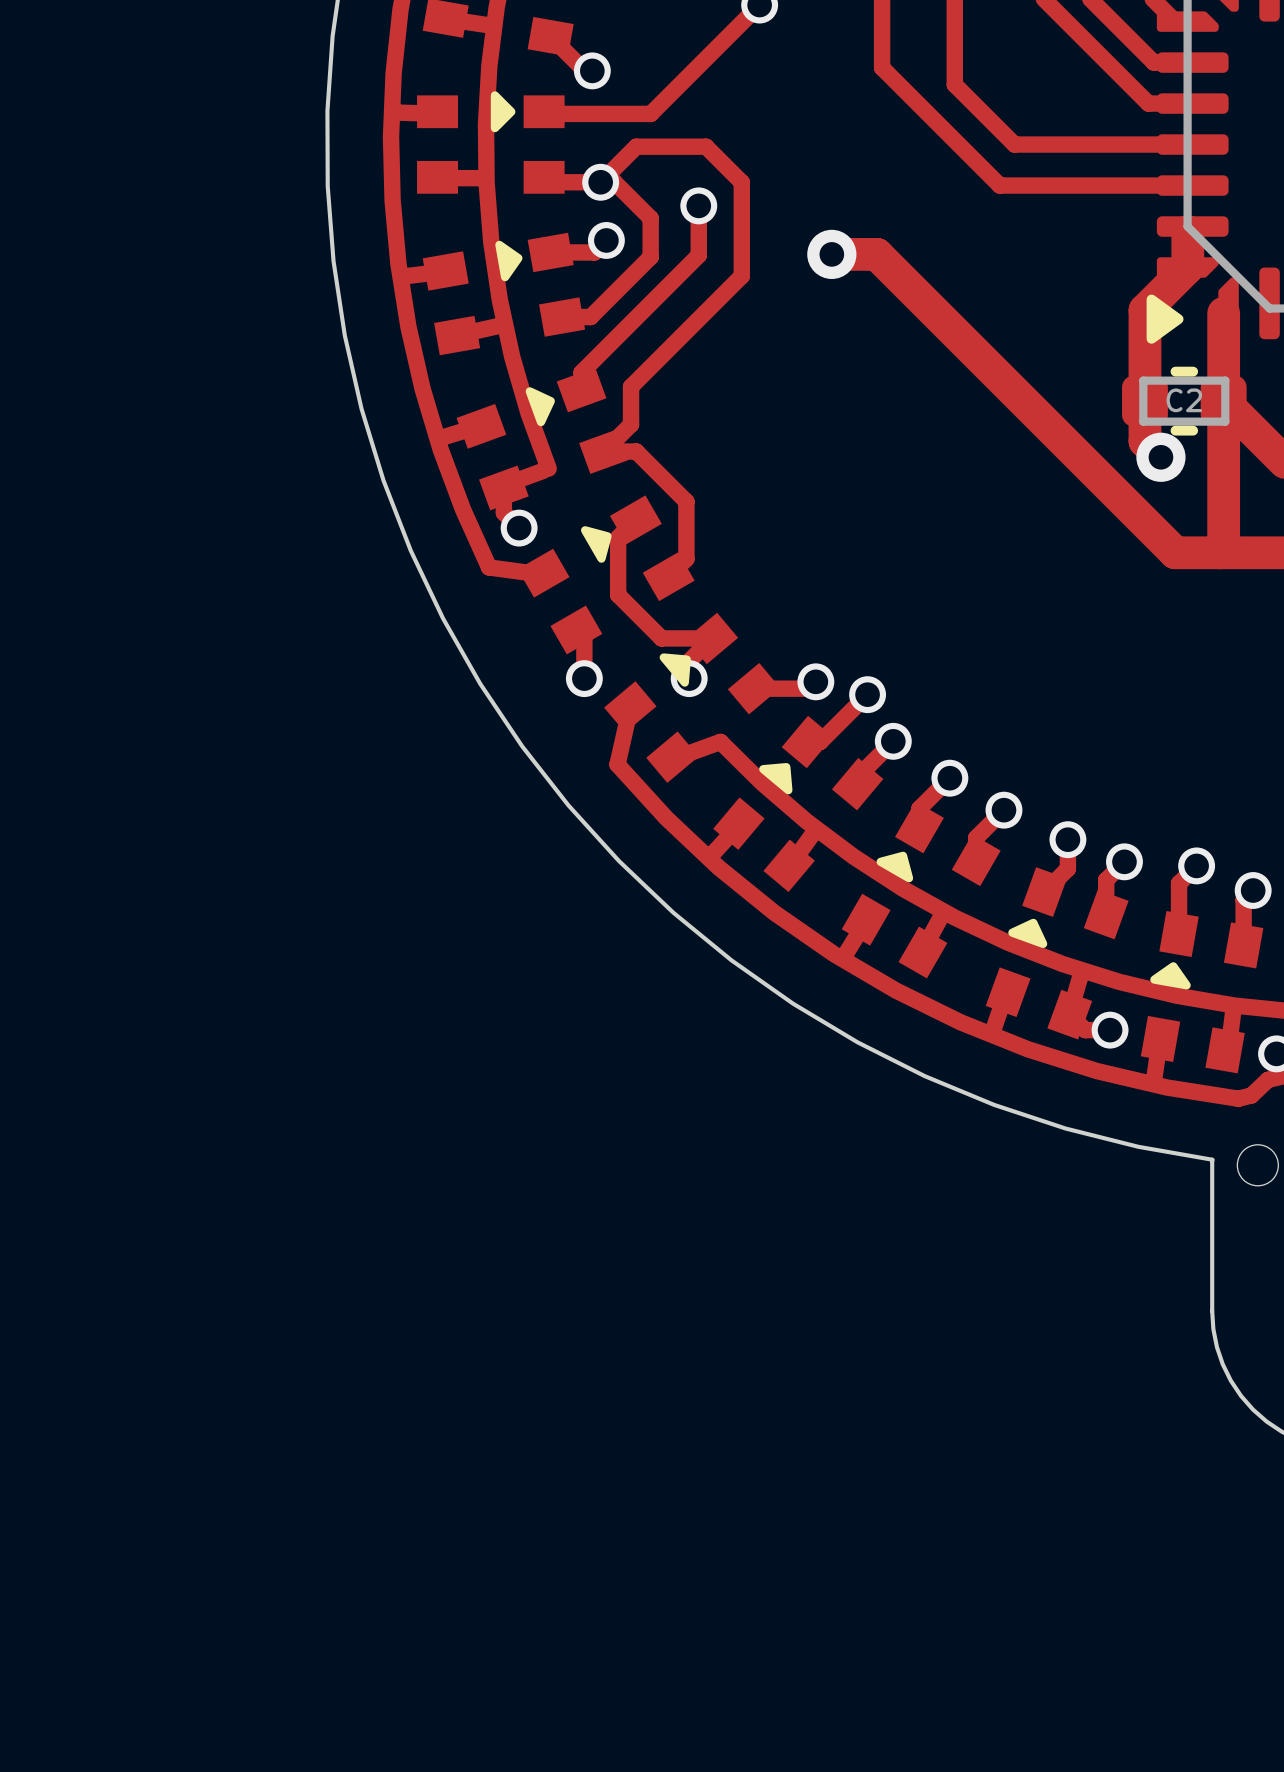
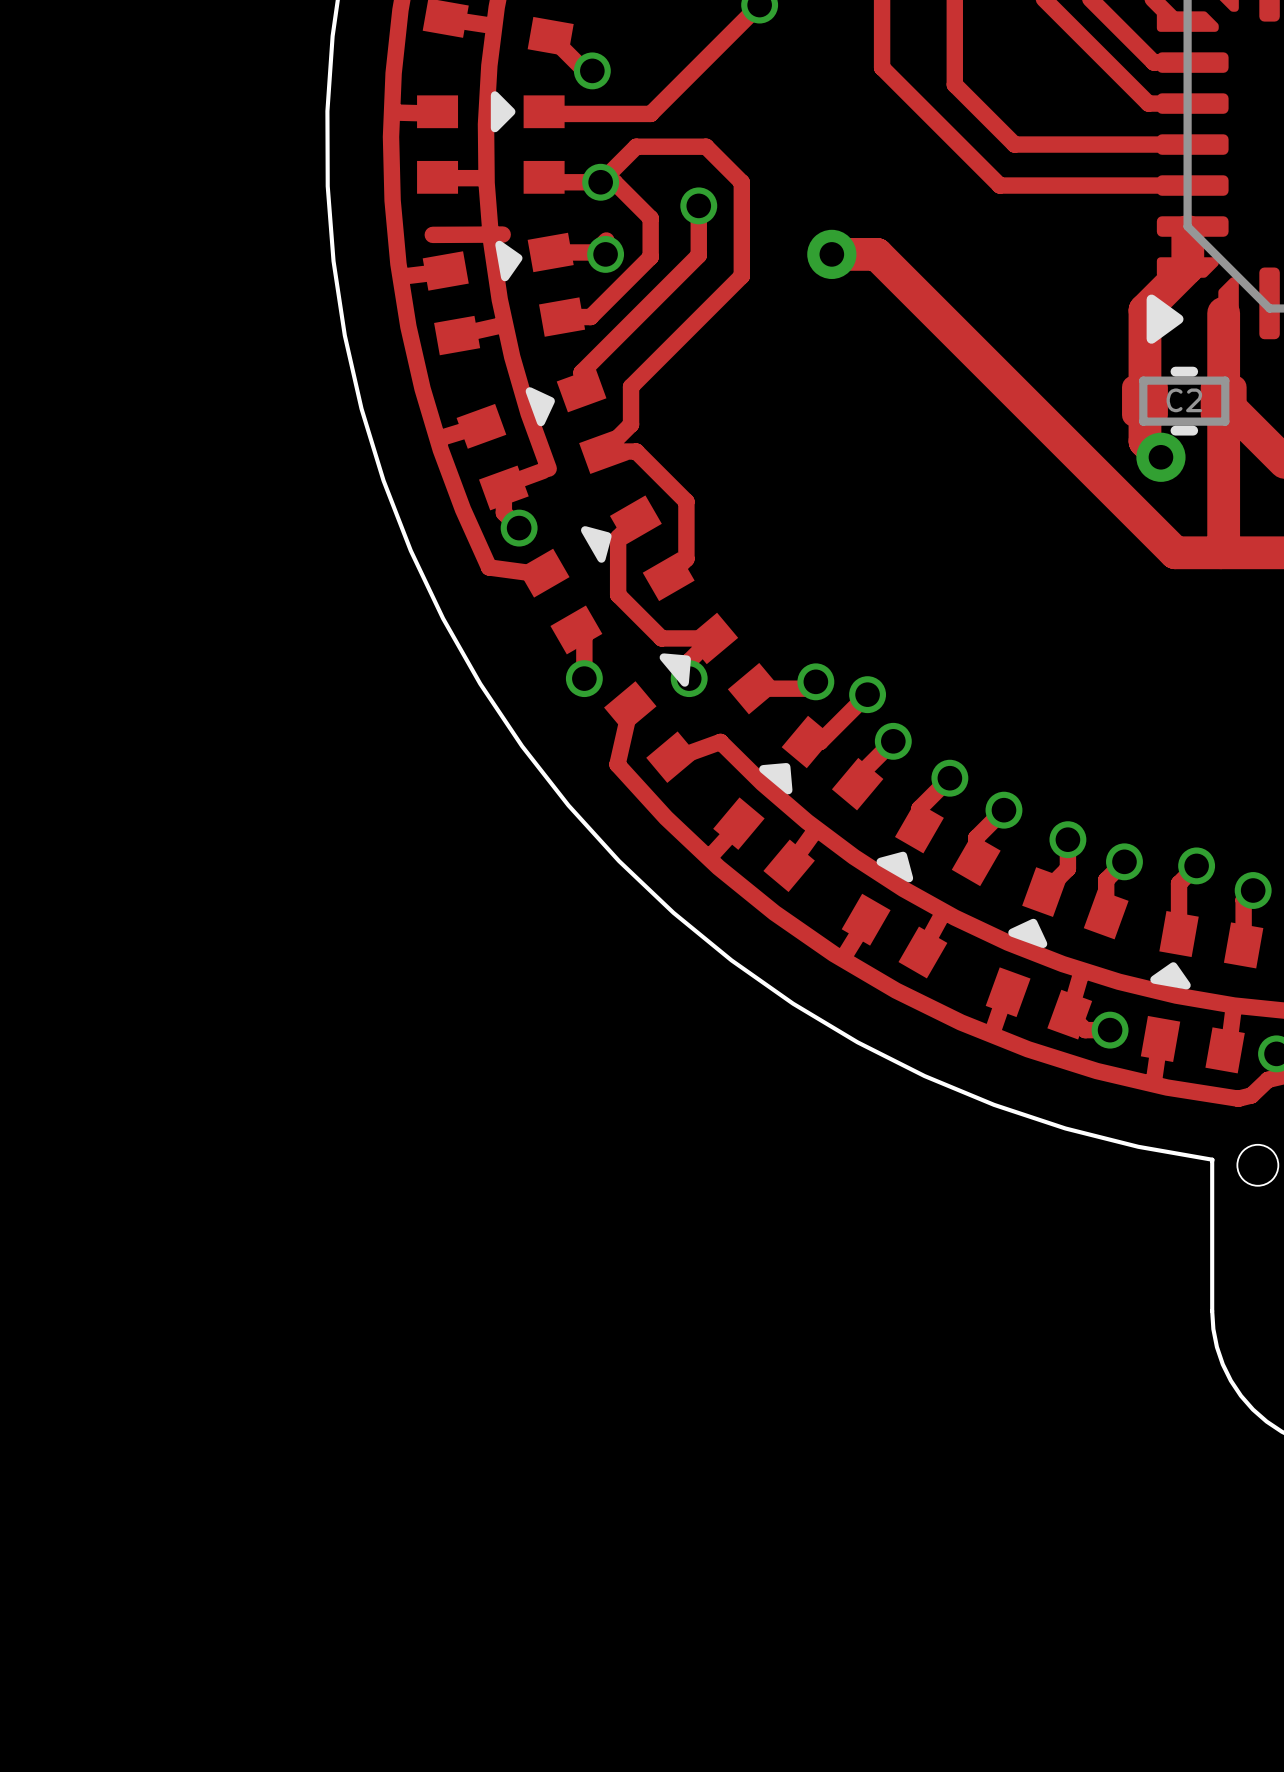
track: none -> (432, 234) (502, 234)
via position: (606, 240) -> (605, 254)

